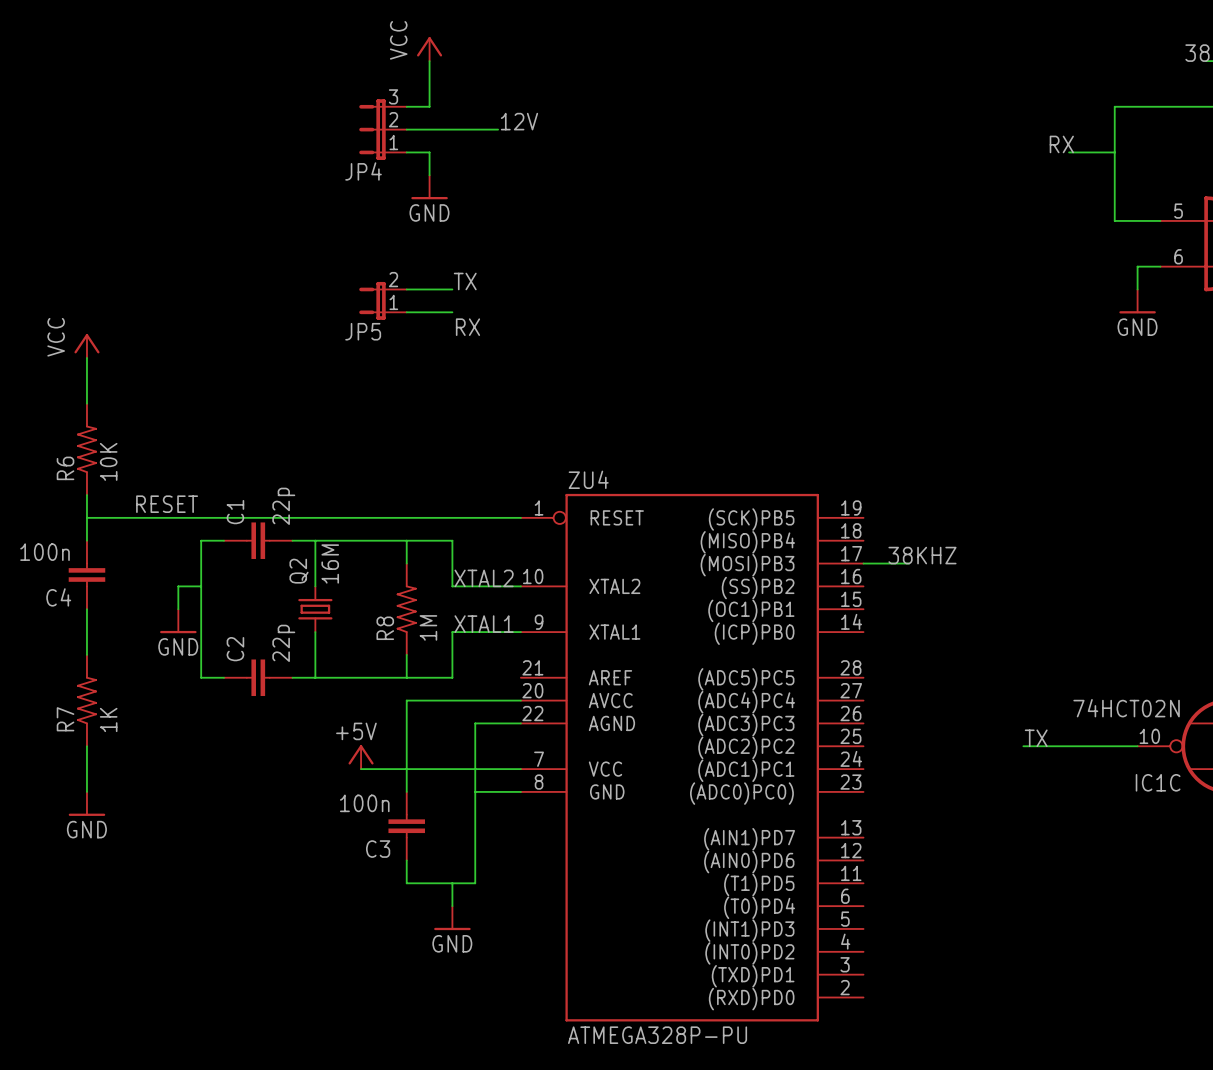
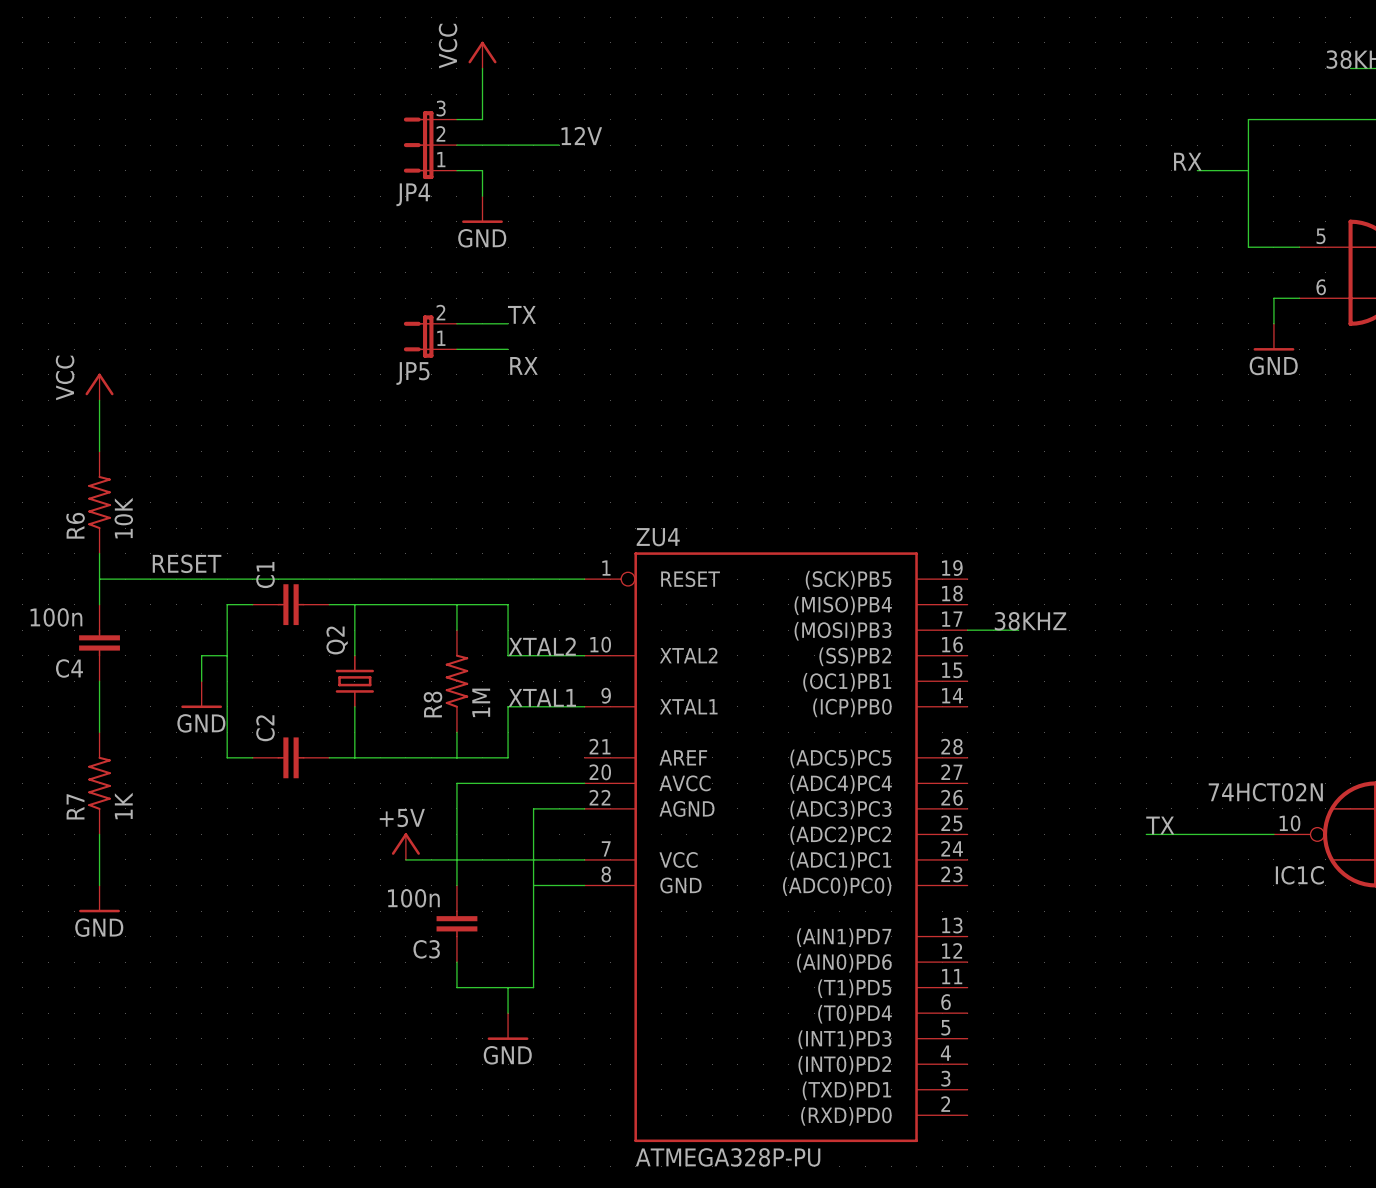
C1 value: 22p (283, 506) -> none
Q2 value: 16M (330, 563) -> none
C2 value: 22p (283, 643) -> none

